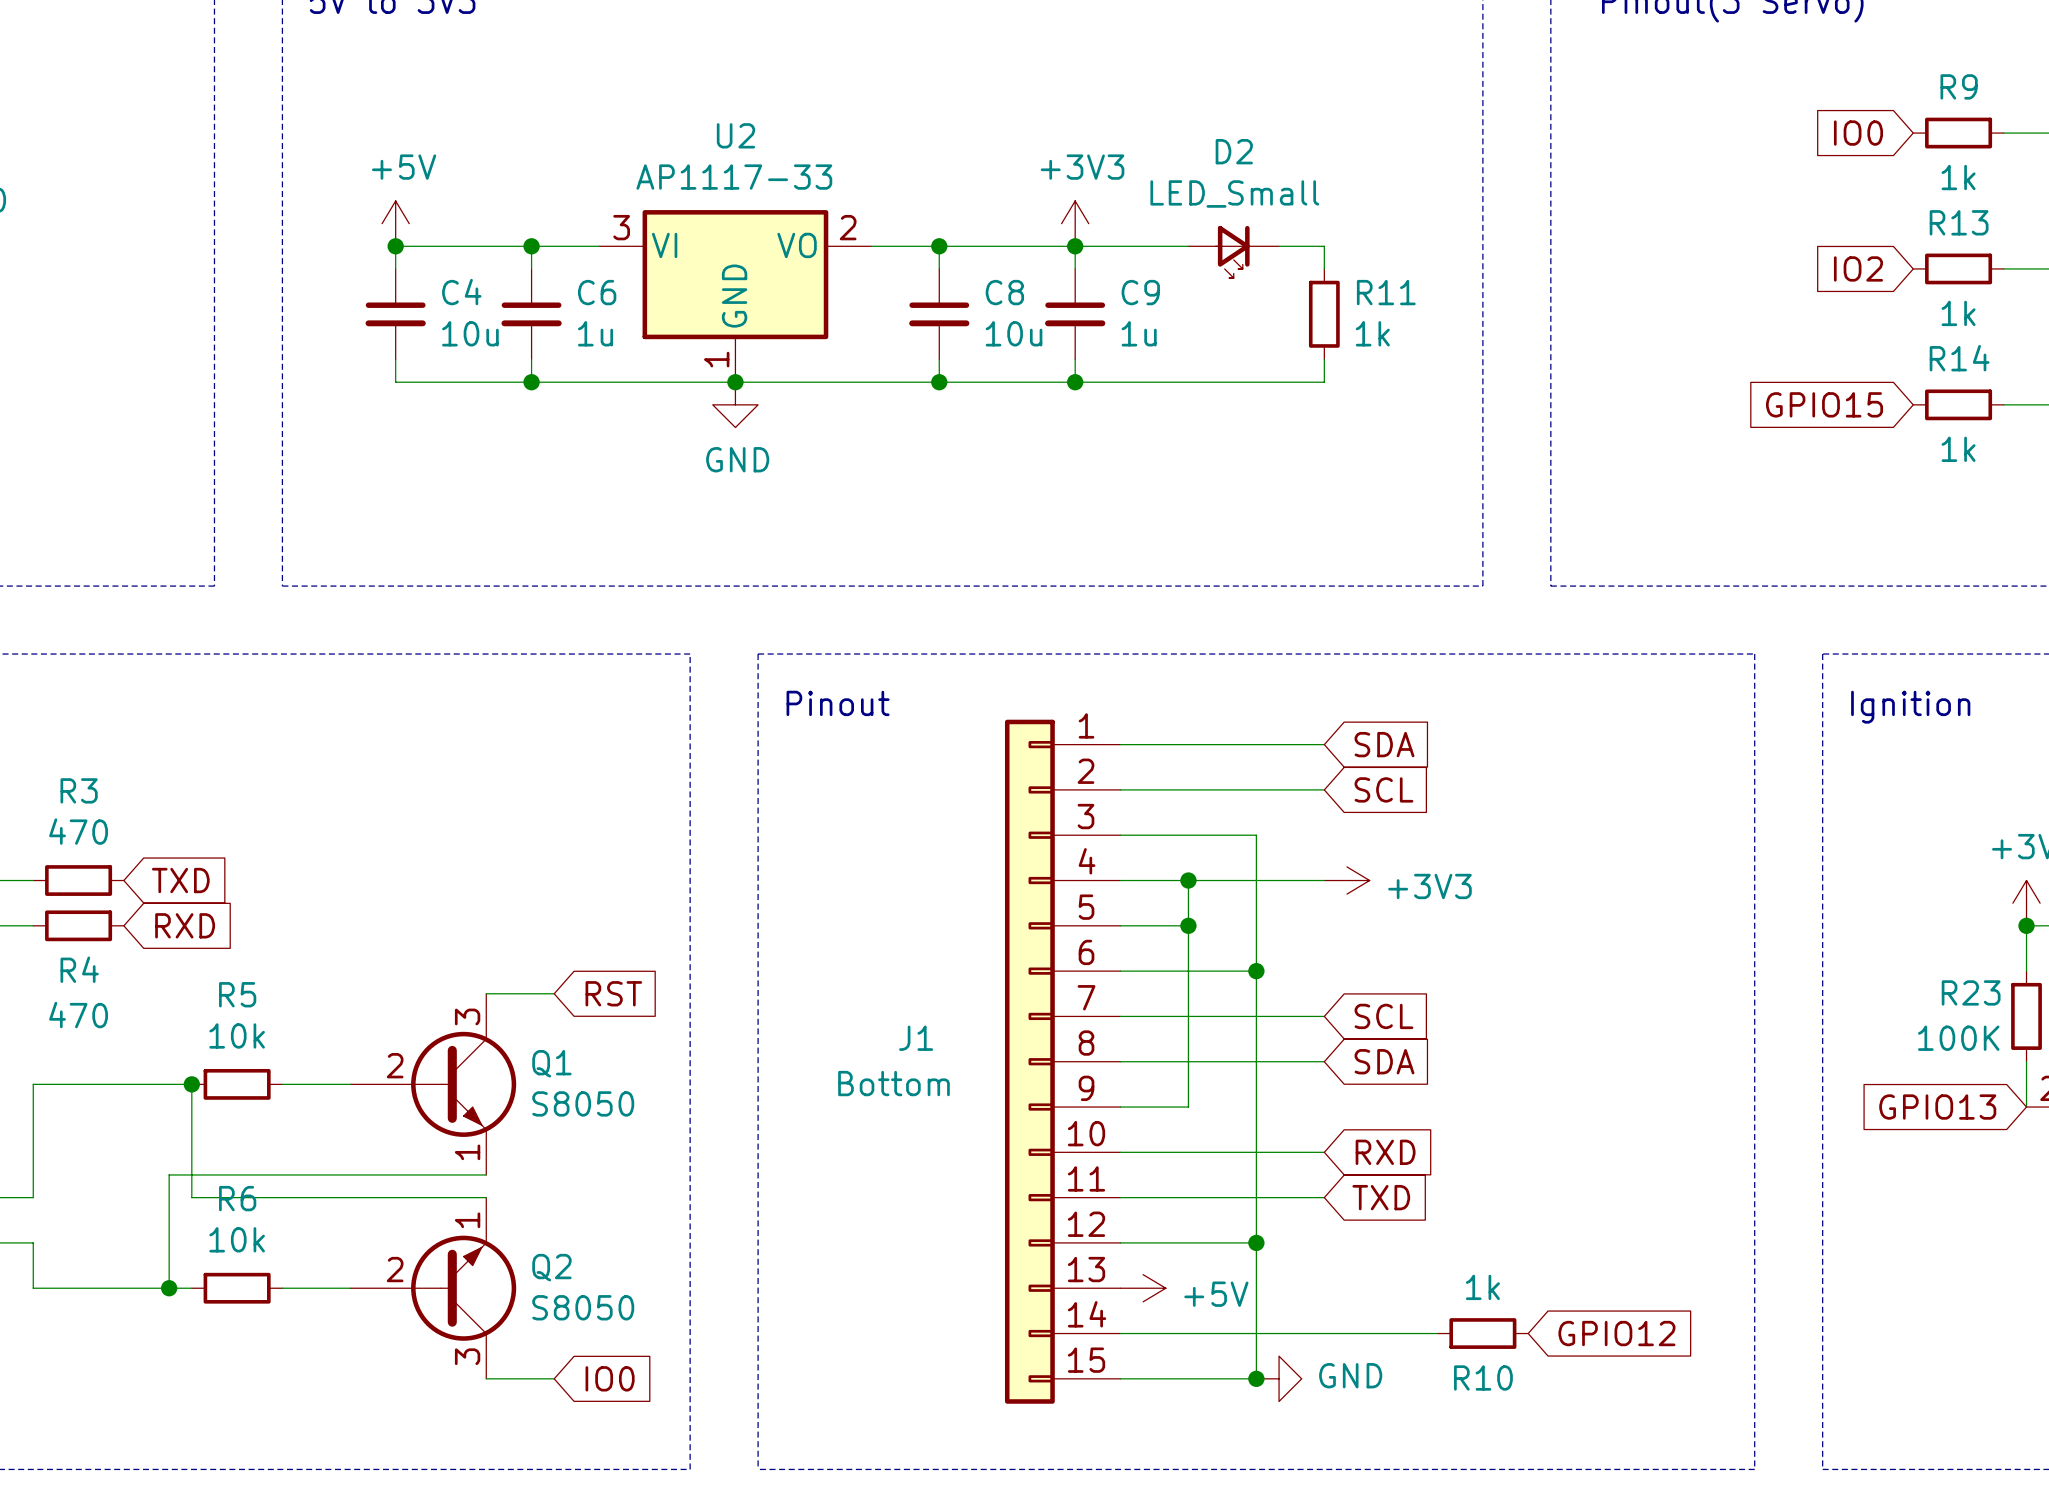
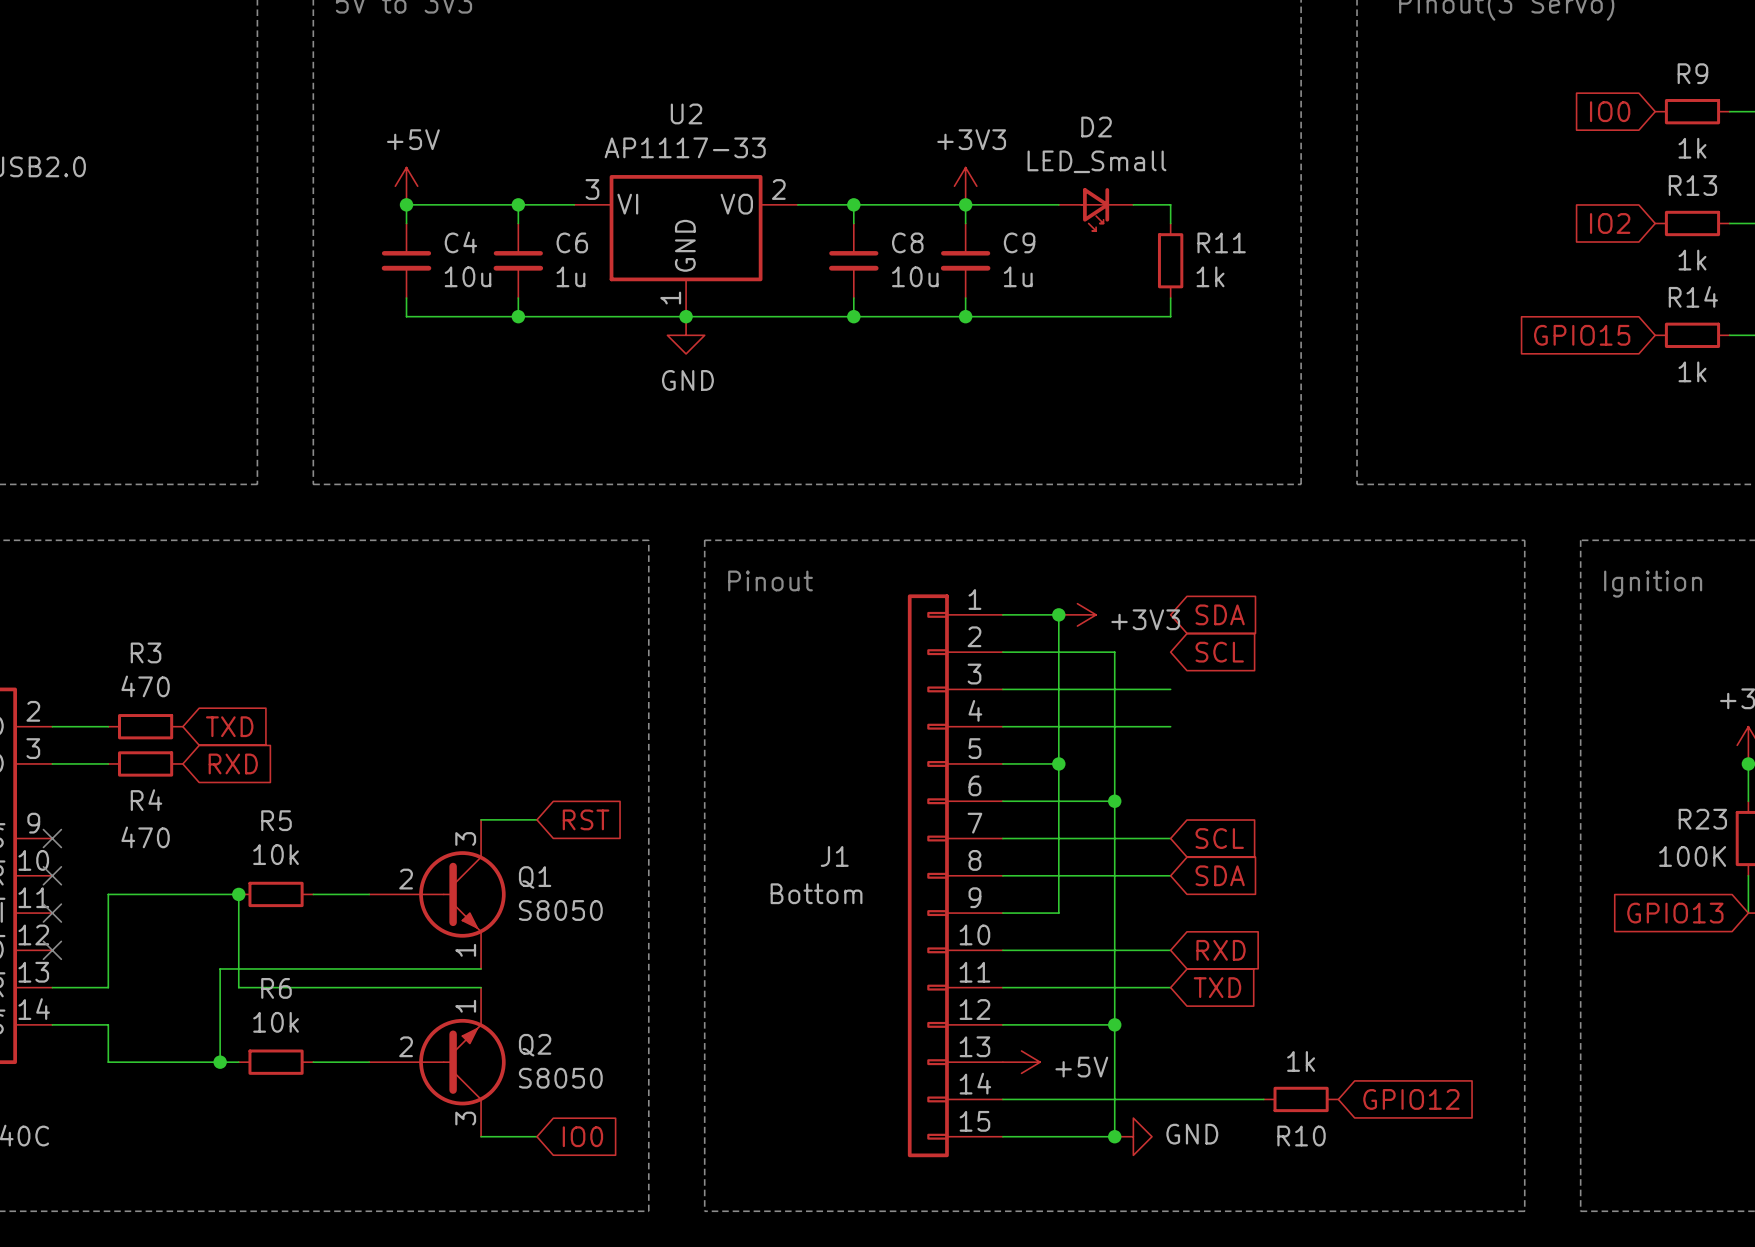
wire: (1188, 744) (1324, 744) -> (1058, 614) (1058, 726)
junction: none -> (1058, 614)
wire: (1256, 789) (1324, 789) -> (1114, 652) (1114, 689) (1170, 689)
junction: (1188, 880) -> none
power symbol position: +3V3 (1346, 880) -> +3V3 (1077, 614)

